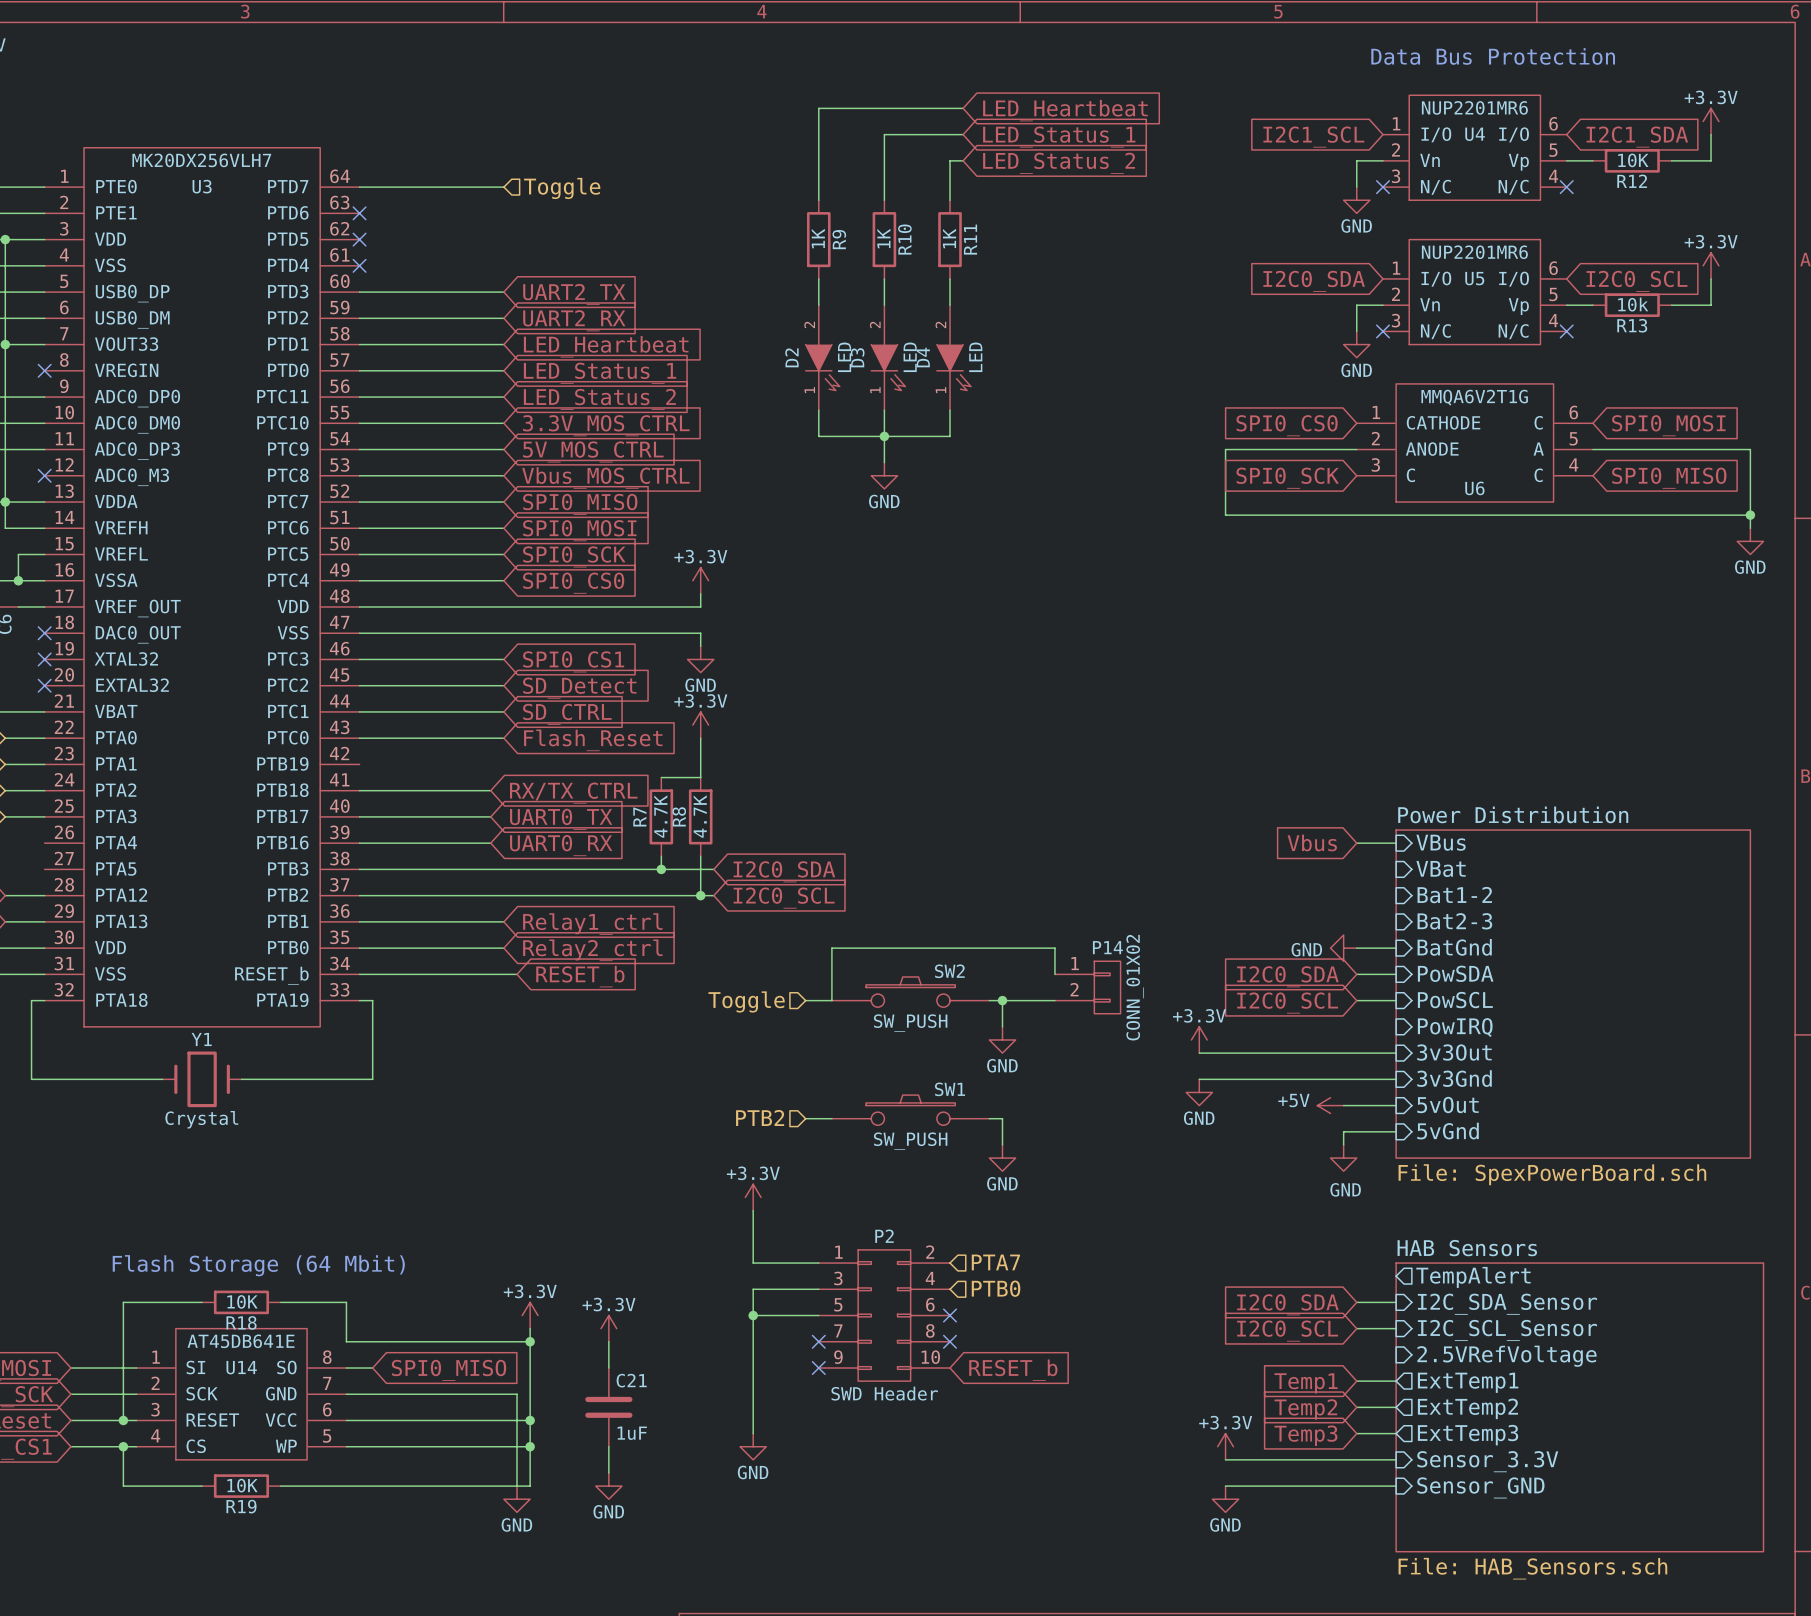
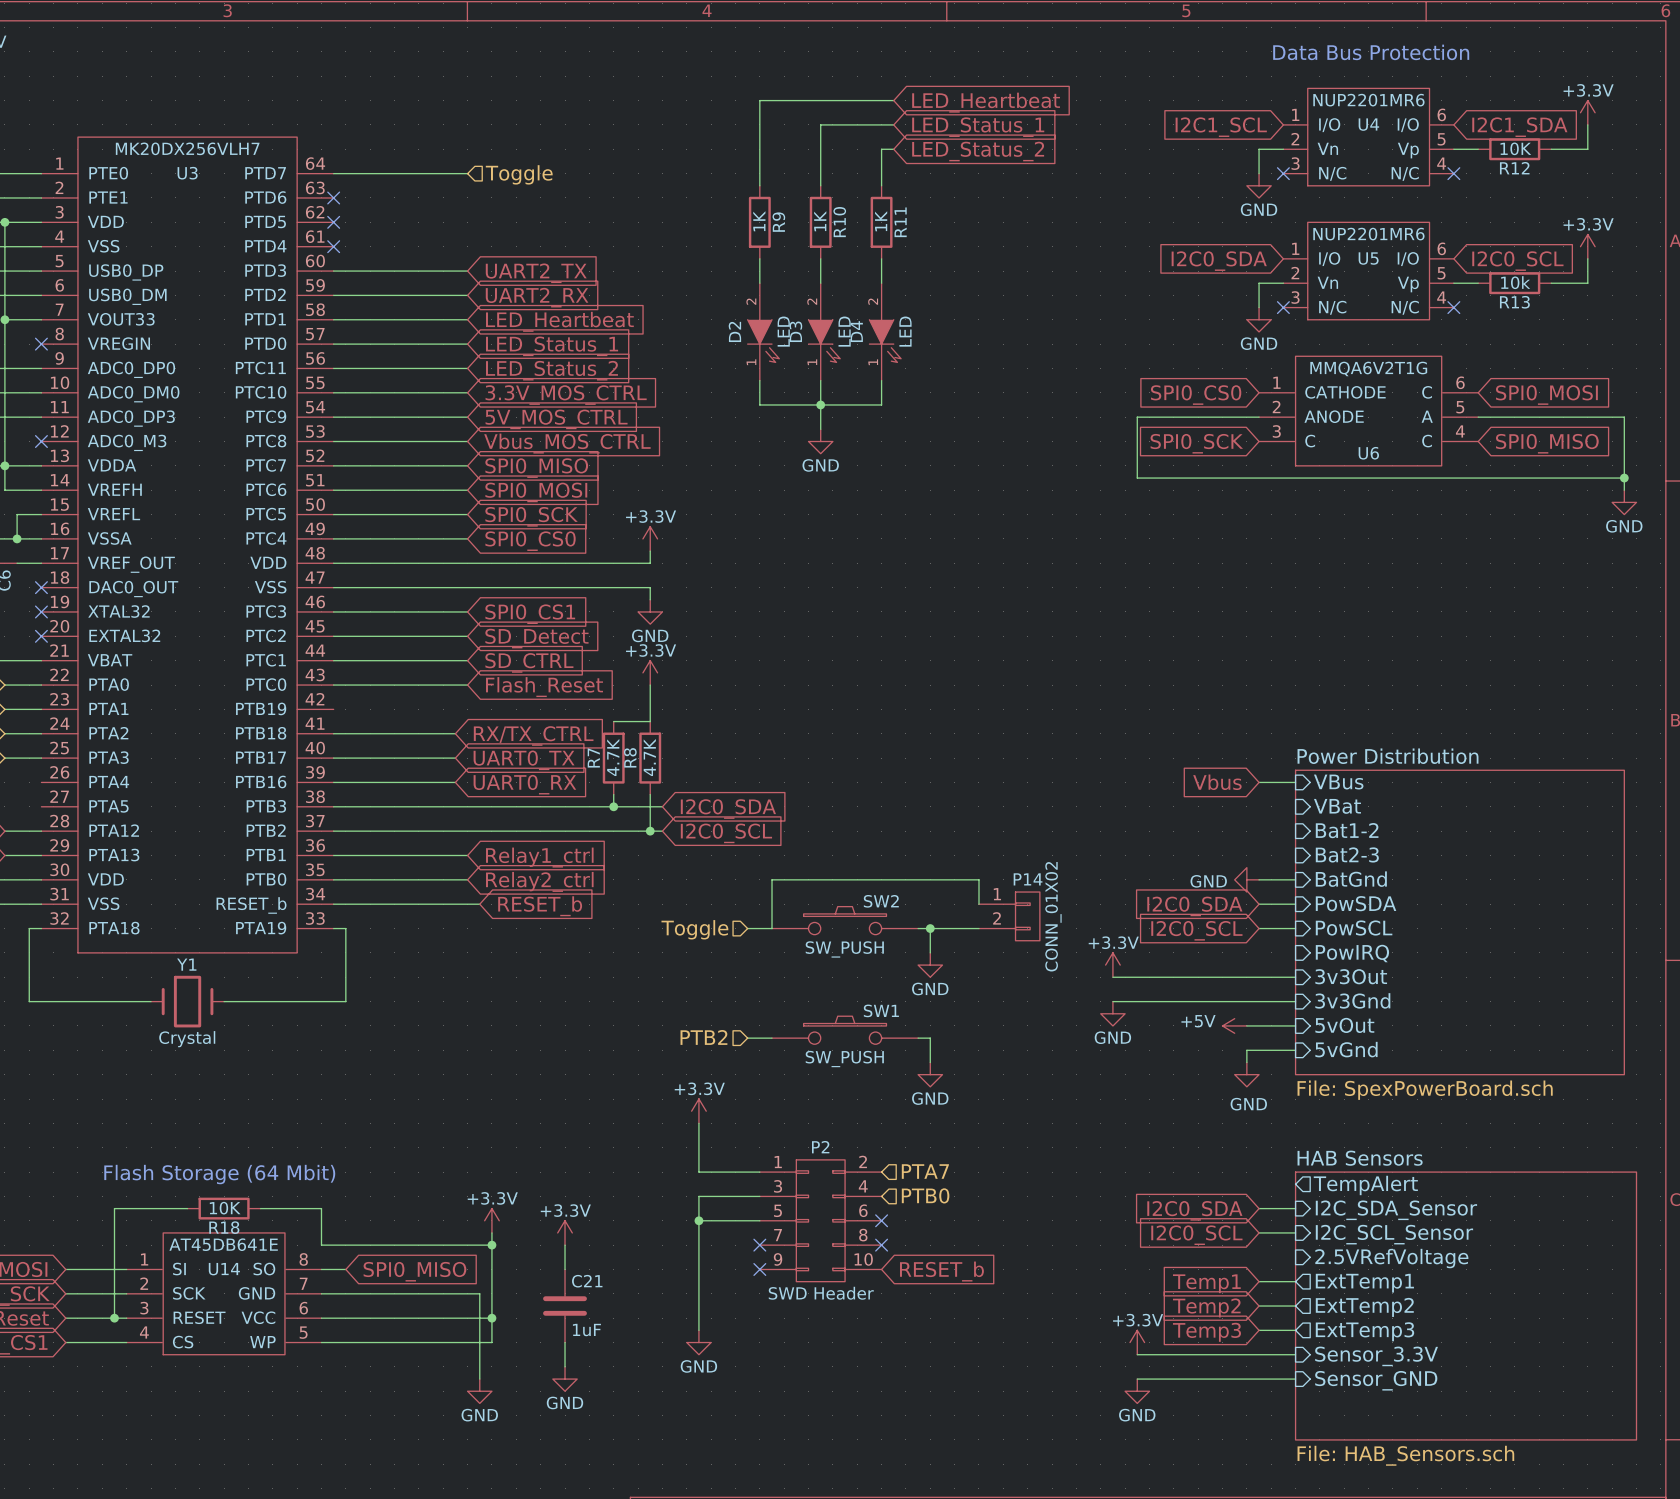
wire: (123, 1446) (123, 1486) (202, 1486) -> none
junction: (123, 1446) -> none
wire: (530, 1446) (530, 1486) (280, 1486) -> none
junction: (530, 1446) -> none
R19: 10K (241, 1486) -> none

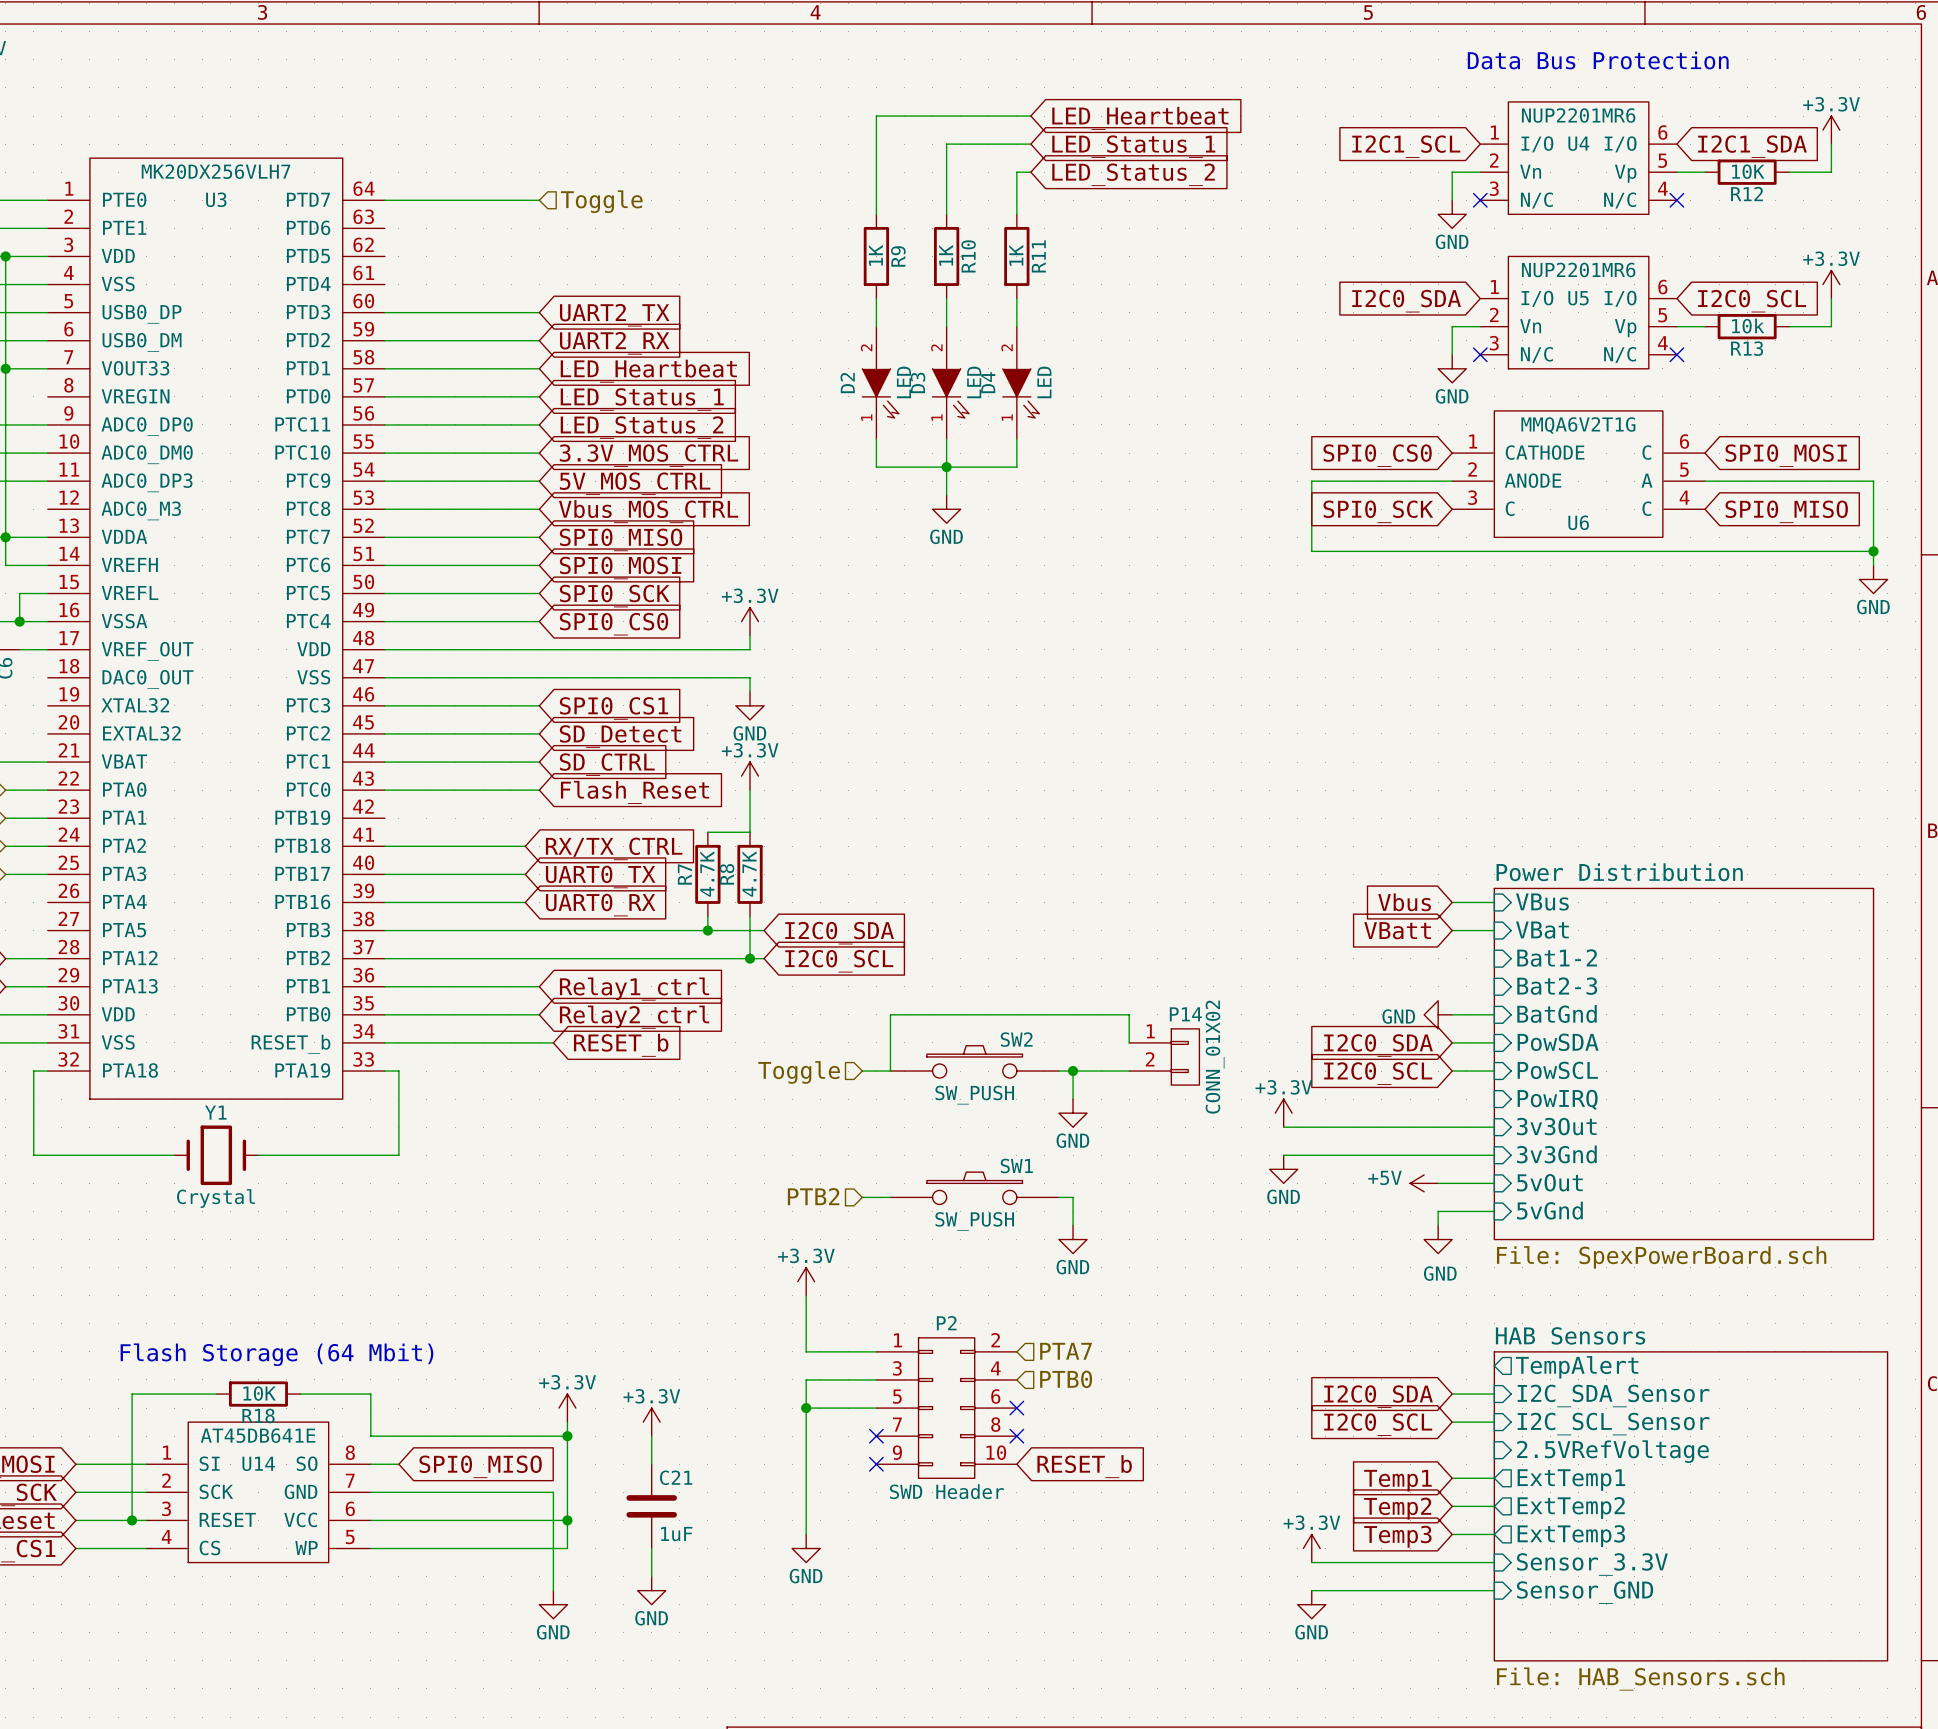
no-connect mark: (333, 197) -> none
no-connect mark: (333, 222) -> none
no-connect mark: (333, 246) -> none
no-connect mark: (41, 344) -> none
no-connect mark: (41, 441) -> none
no-connect mark: (41, 587) -> none
no-connect mark: (41, 611) -> none
no-connect mark: (41, 636) -> none
global label: none -> VBatt (1397, 930)
wire: none -> (1452, 930) (1494, 930)

